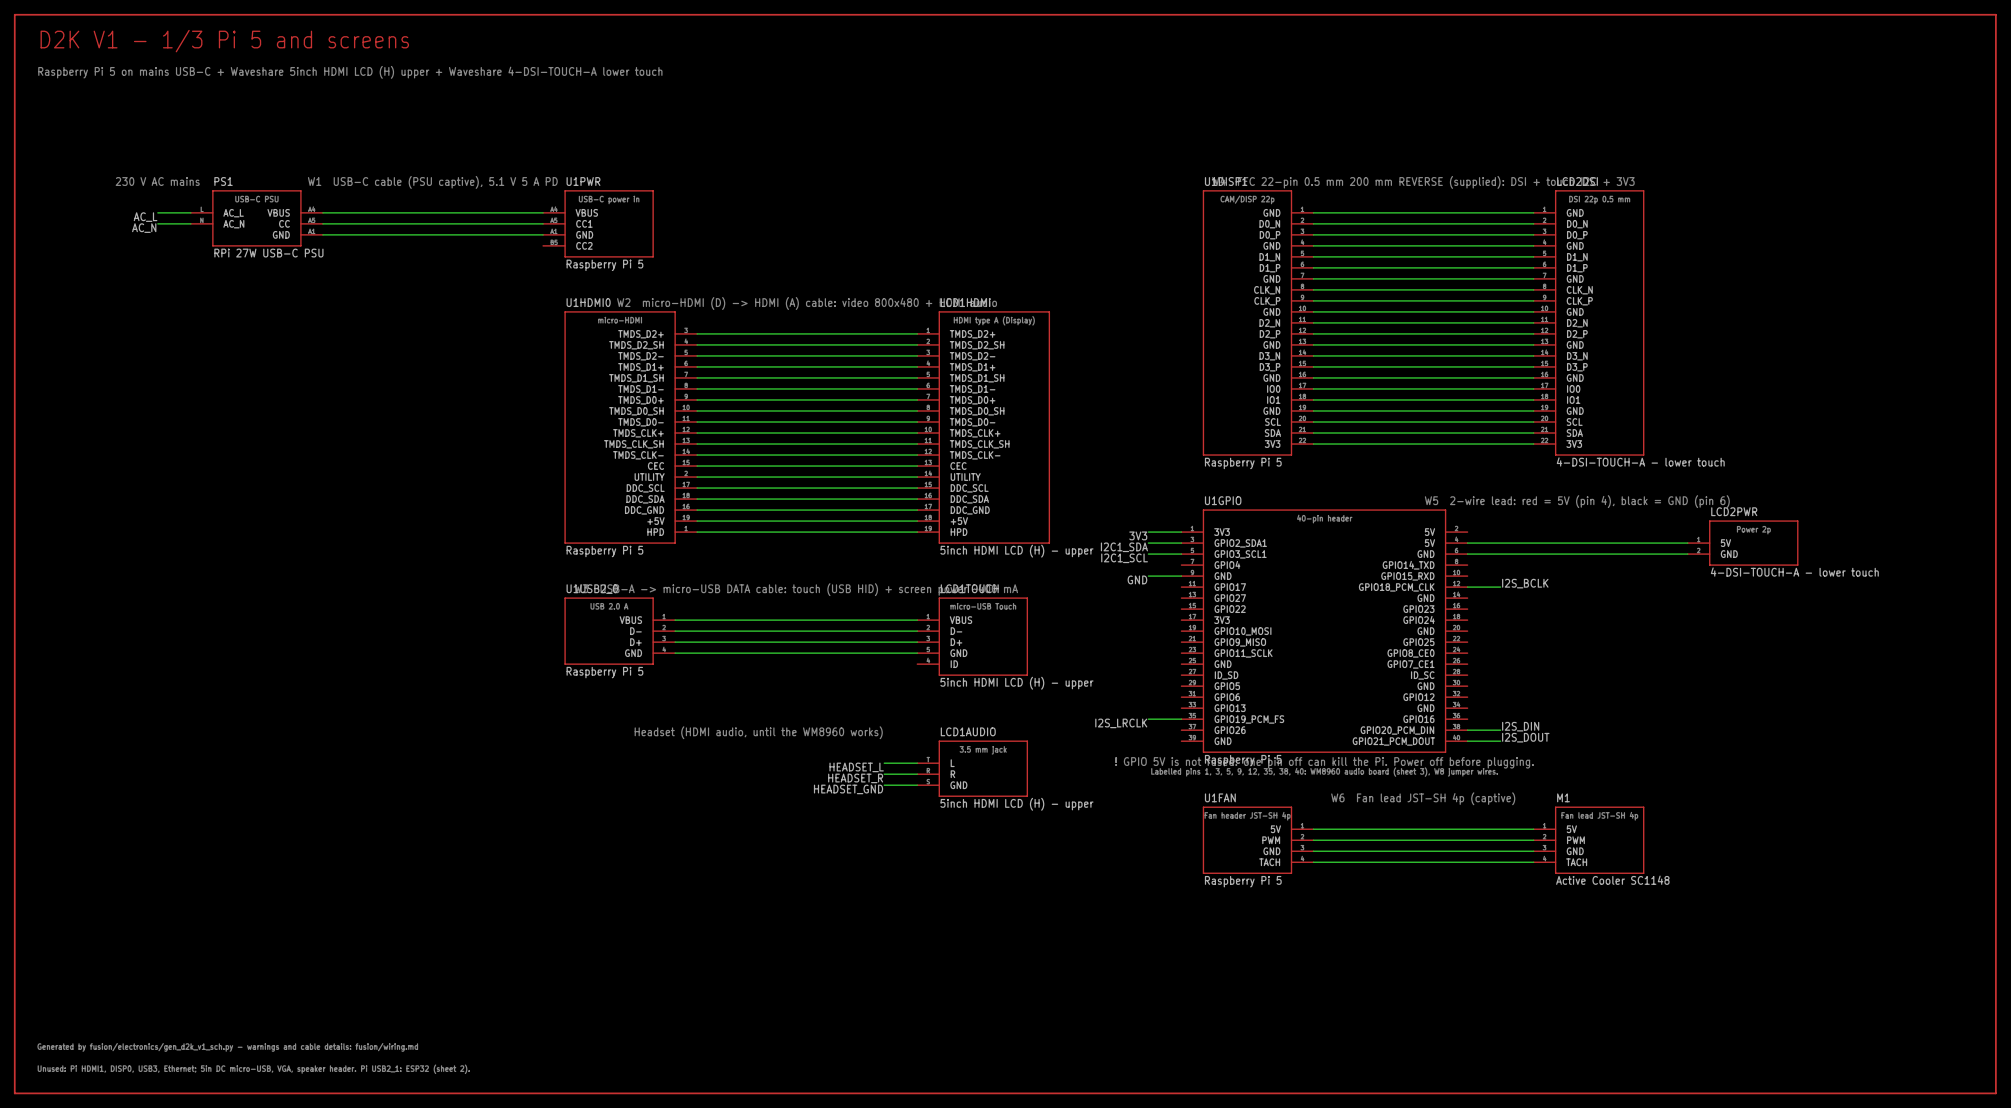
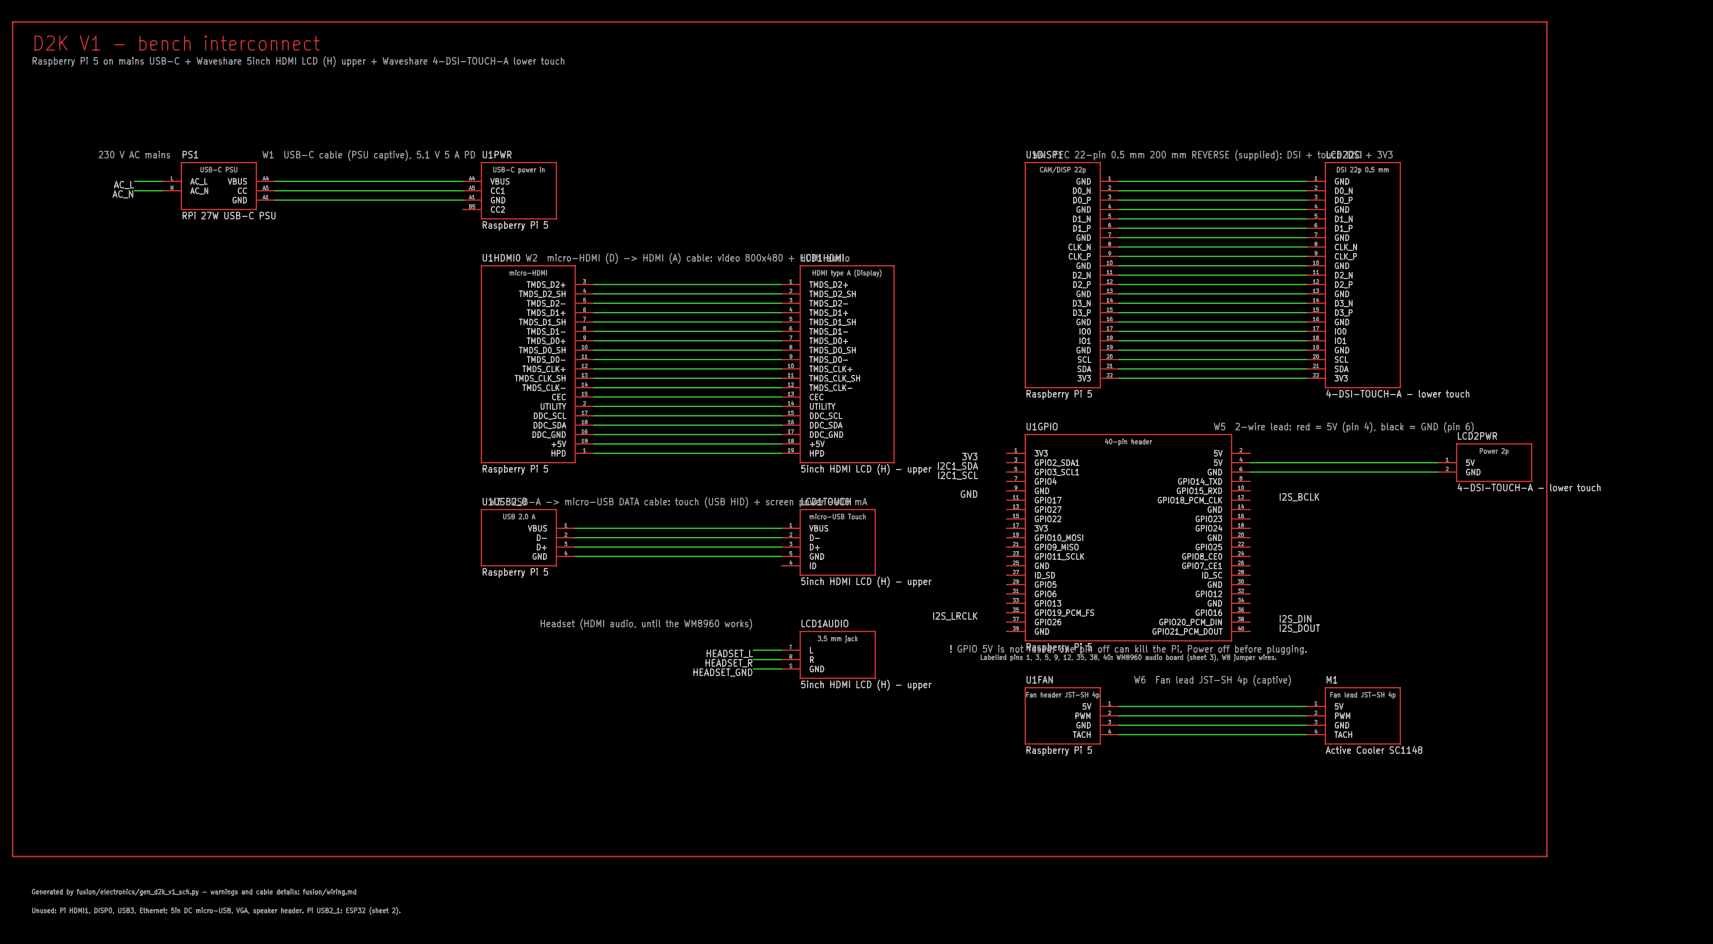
line: (14, 25) (14, 14) (1995, 14) (1995, 1093) (14, 1093) (14, 1005) -> (12, 21) (1546, 21) (1546, 856) (12, 856)
text: D2K V1 - 1/3 Pi 5 and screens (224, 41) -> none
text: none -> D2K V1 - bench interconnect (177, 43)
wire: (1148, 532) (1181, 532) -> none
wire: (1148, 543) (1181, 543) -> none
wire: (1148, 554) (1181, 554) -> none
wire: (1148, 576) (1181, 576) -> none
wire: (1467, 587) (1500, 587) -> none
wire: (1148, 719) (1181, 719) -> none
wire: (1467, 730) (1500, 730) -> none
wire: (1467, 741) (1500, 741) -> none

